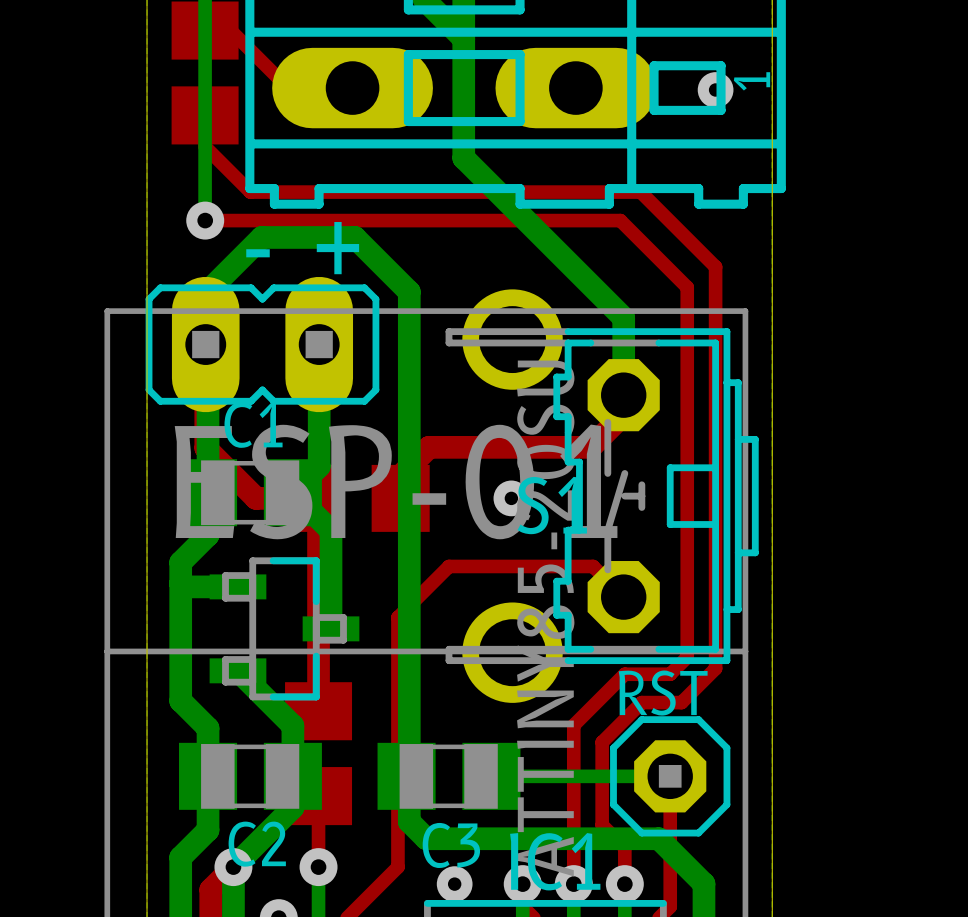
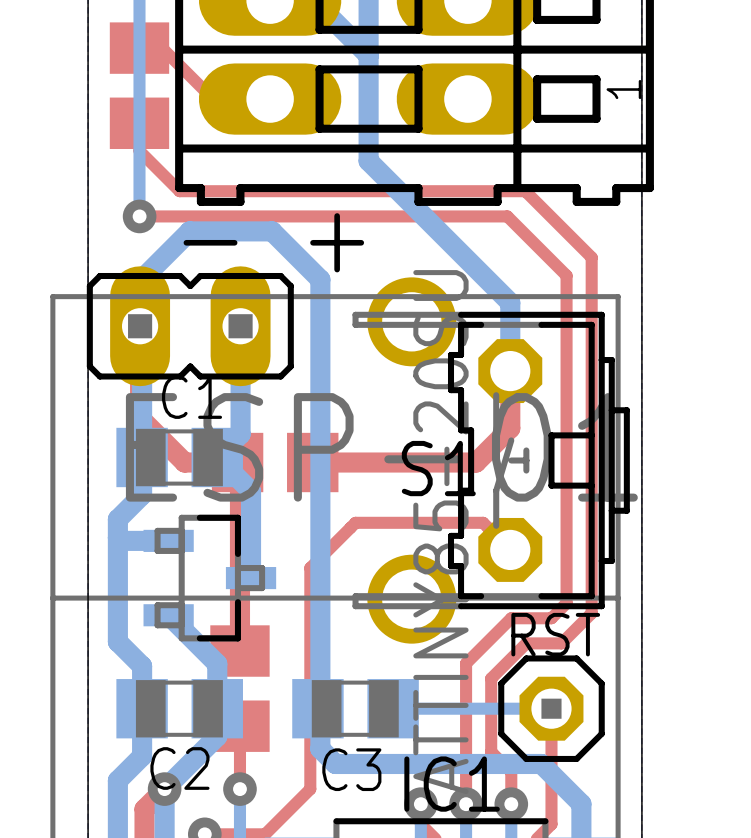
via: (715, 89) -> none
top track: (623, 414) (590, 447) (429, 447) (400, 475) (400, 498) -> (510, 388) (510, 428) (476, 462) (312, 462)
via: (511, 498) -> none
via: (454, 884) -> none

